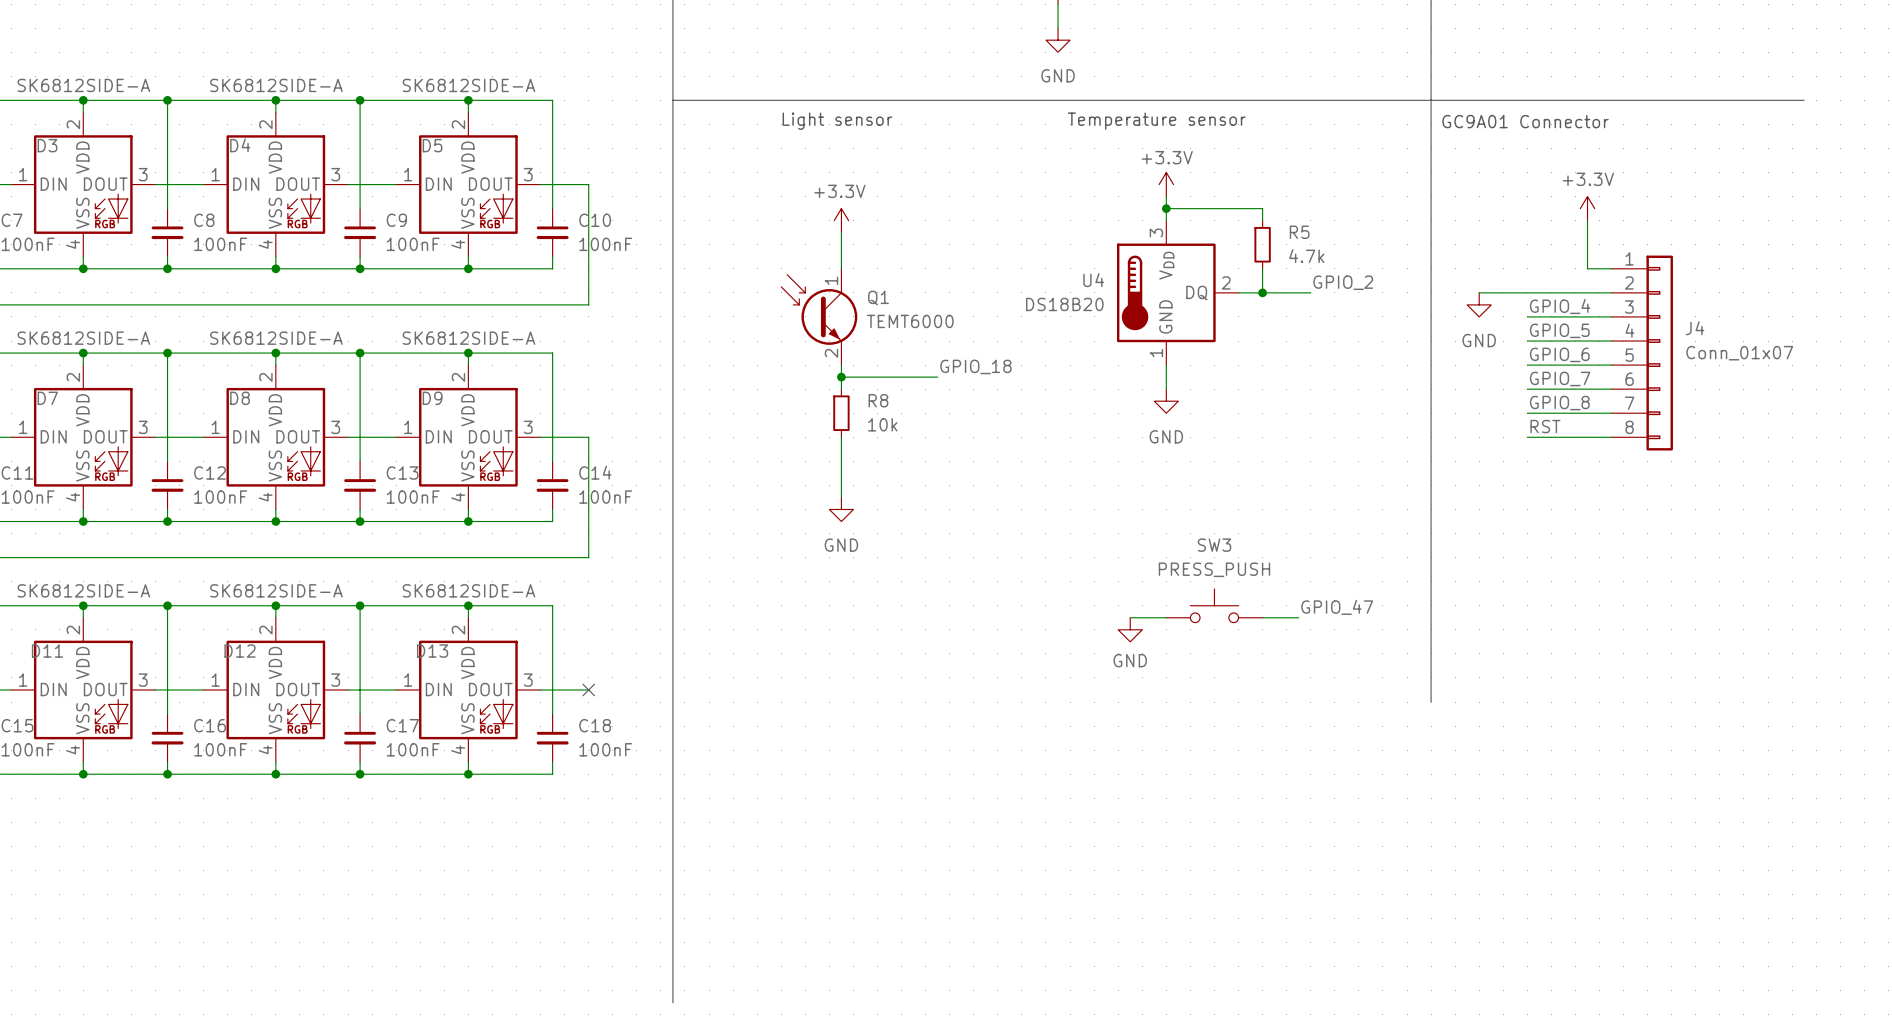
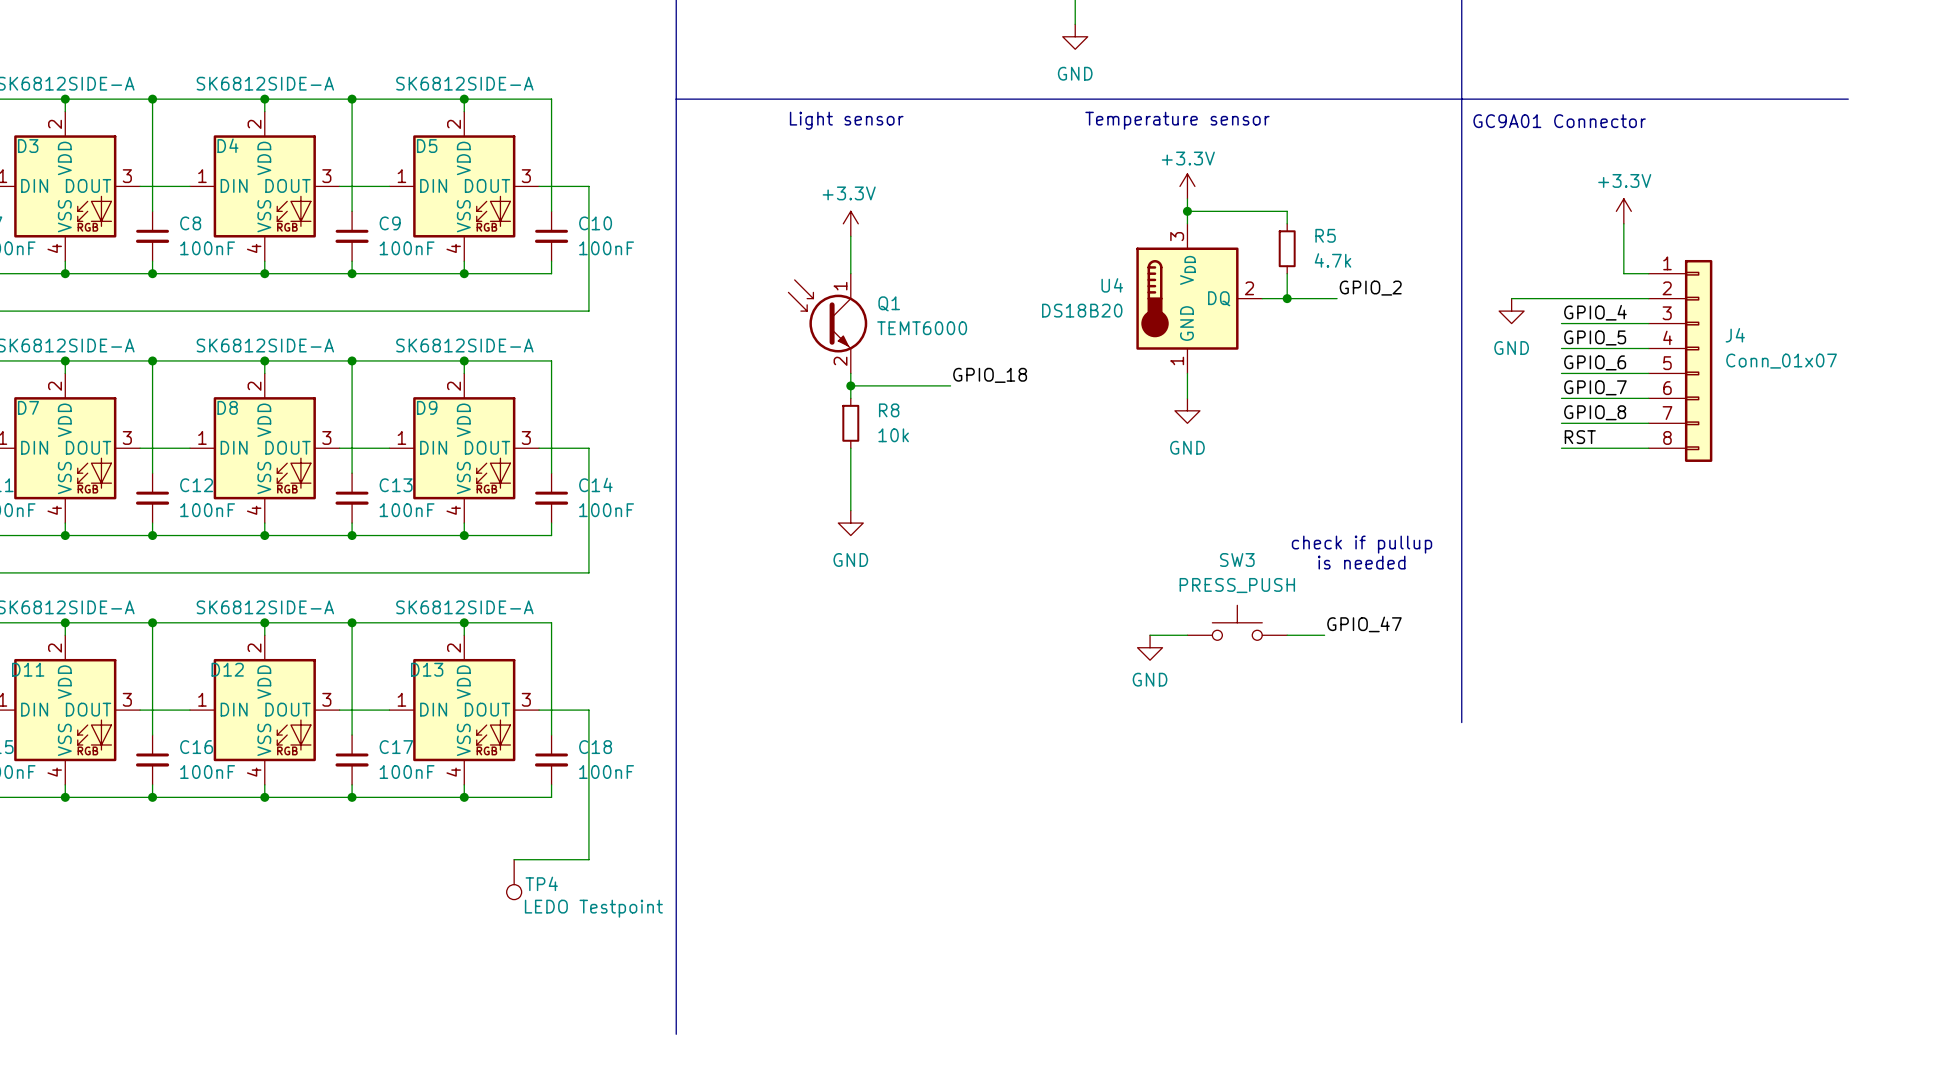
text: none -> check if pullup (1362, 544)
text: none -> is needed (1361, 562)
wire: none -> (588, 710) (588, 859) (514, 859)
no-connect mark: (588, 689) -> none
TP4: none -> LEDO Testpoint (514, 879)

